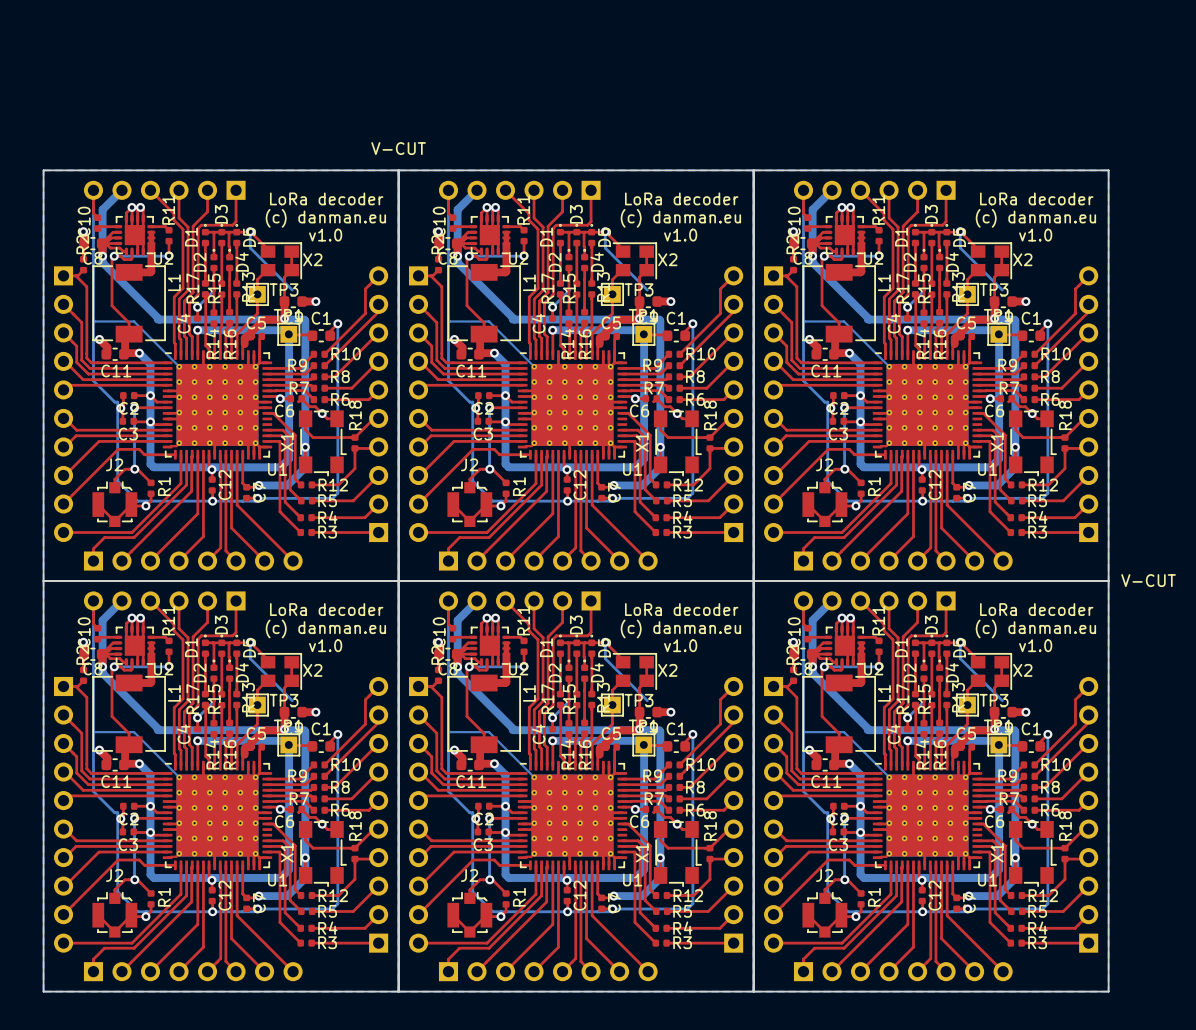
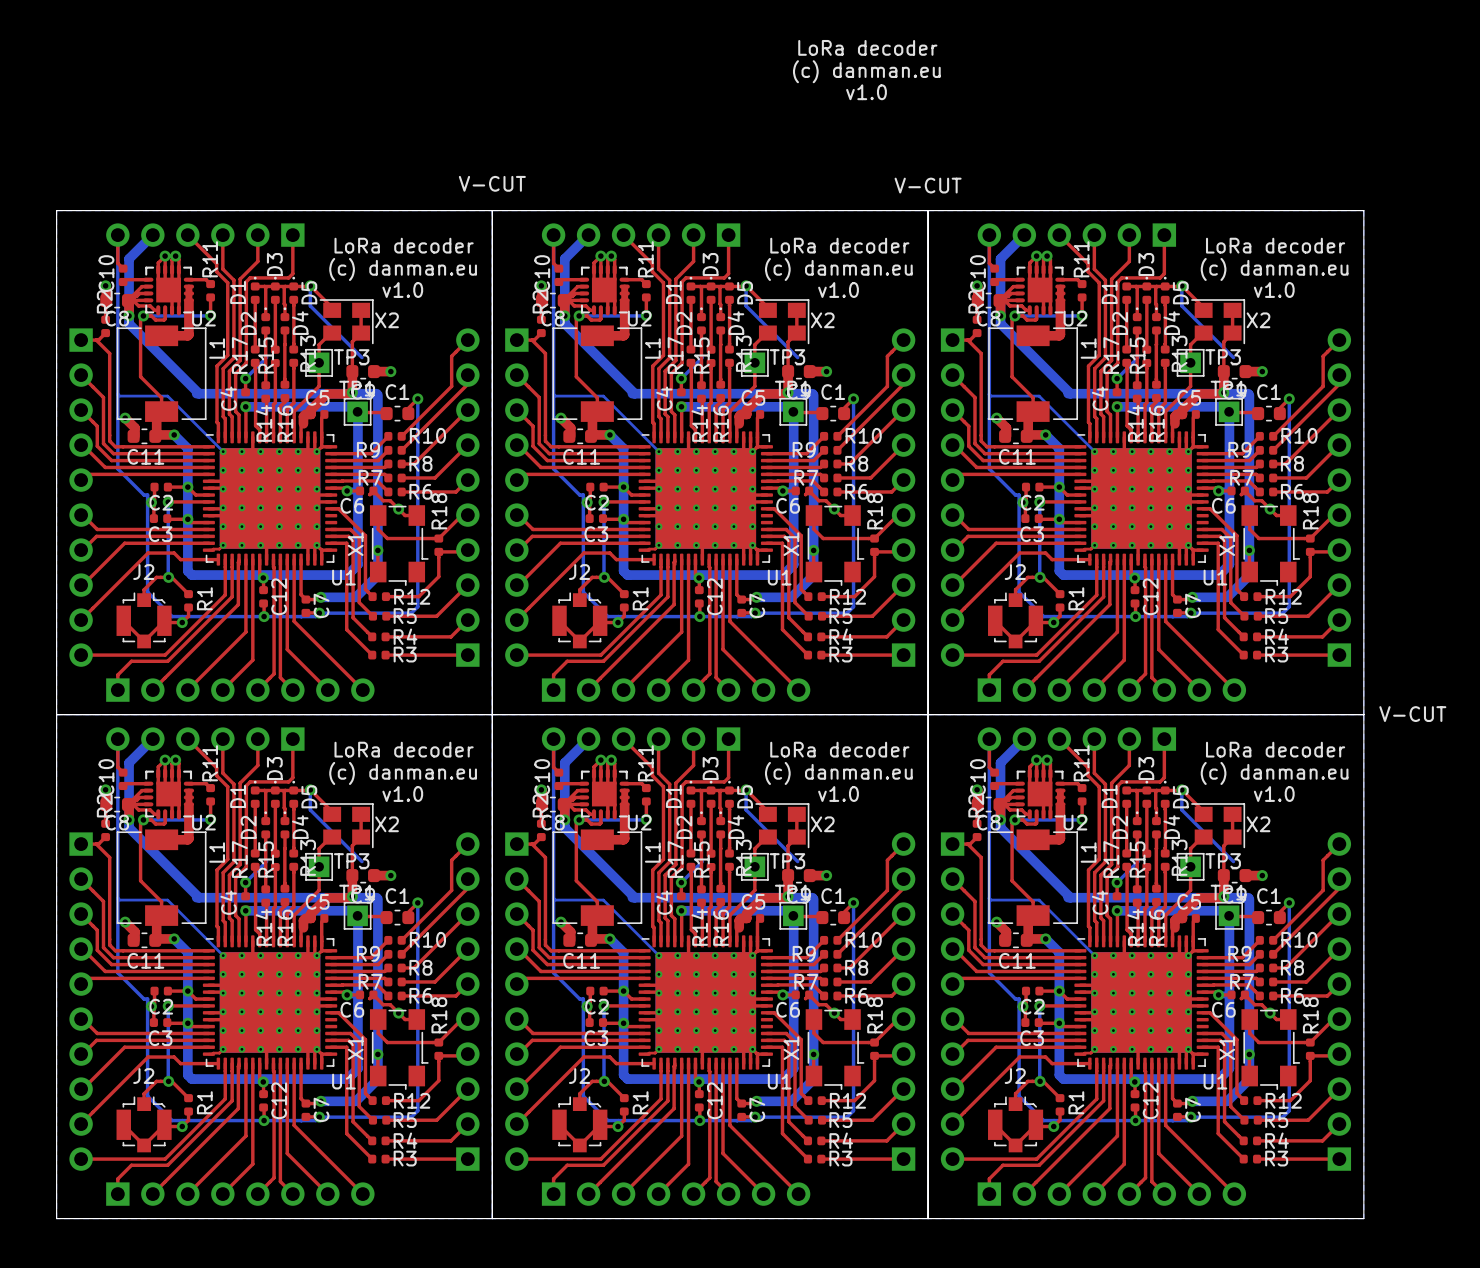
text: none -> LoRa decoder (867, 47)
text: none -> (c) danman.eu (866, 71)
text: none -> v1.0 (866, 92)
text: none -> V-CUT (928, 185)

